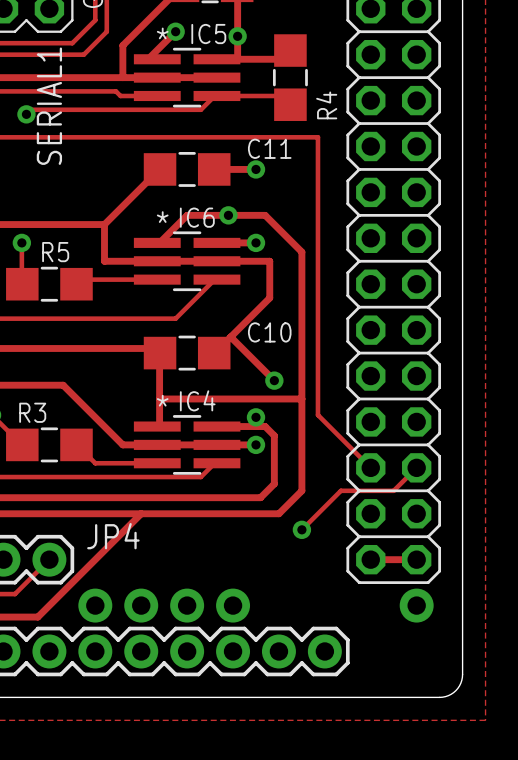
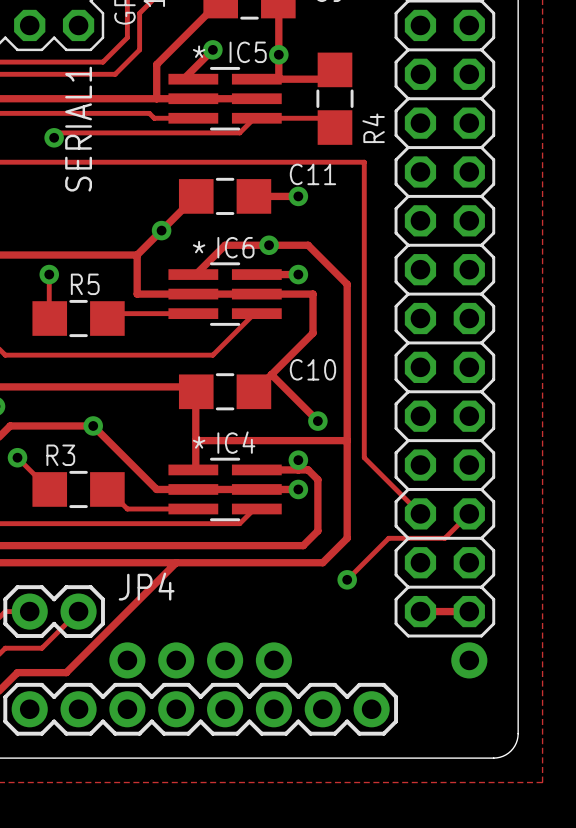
via: none -> (161, 230)
via: none -> (93, 425)

